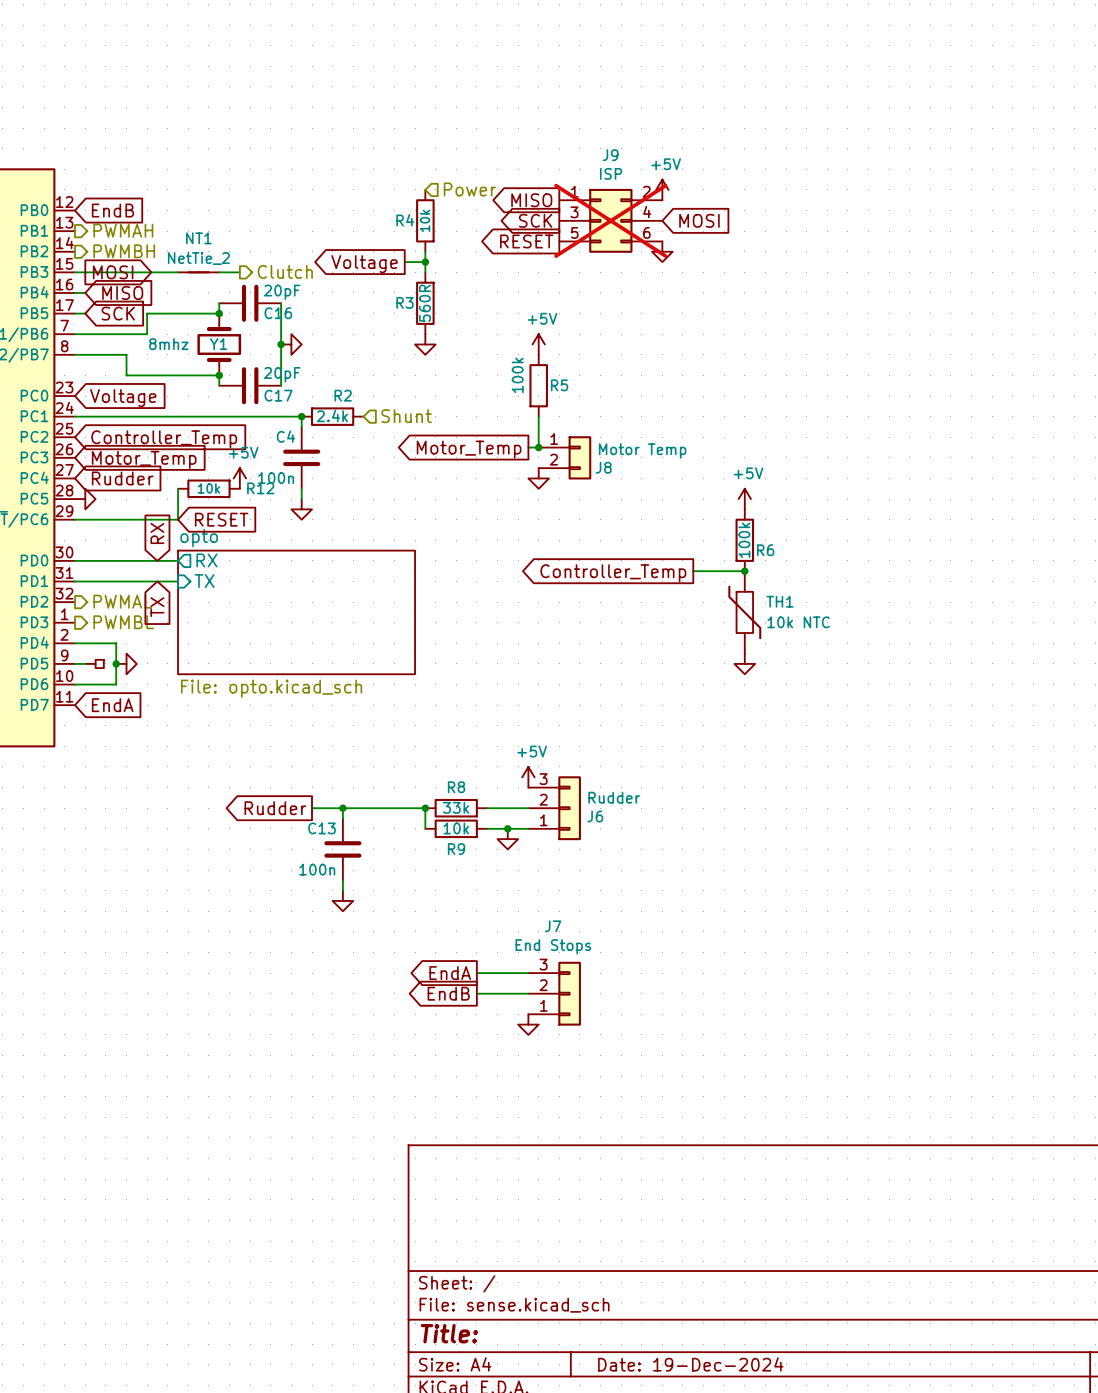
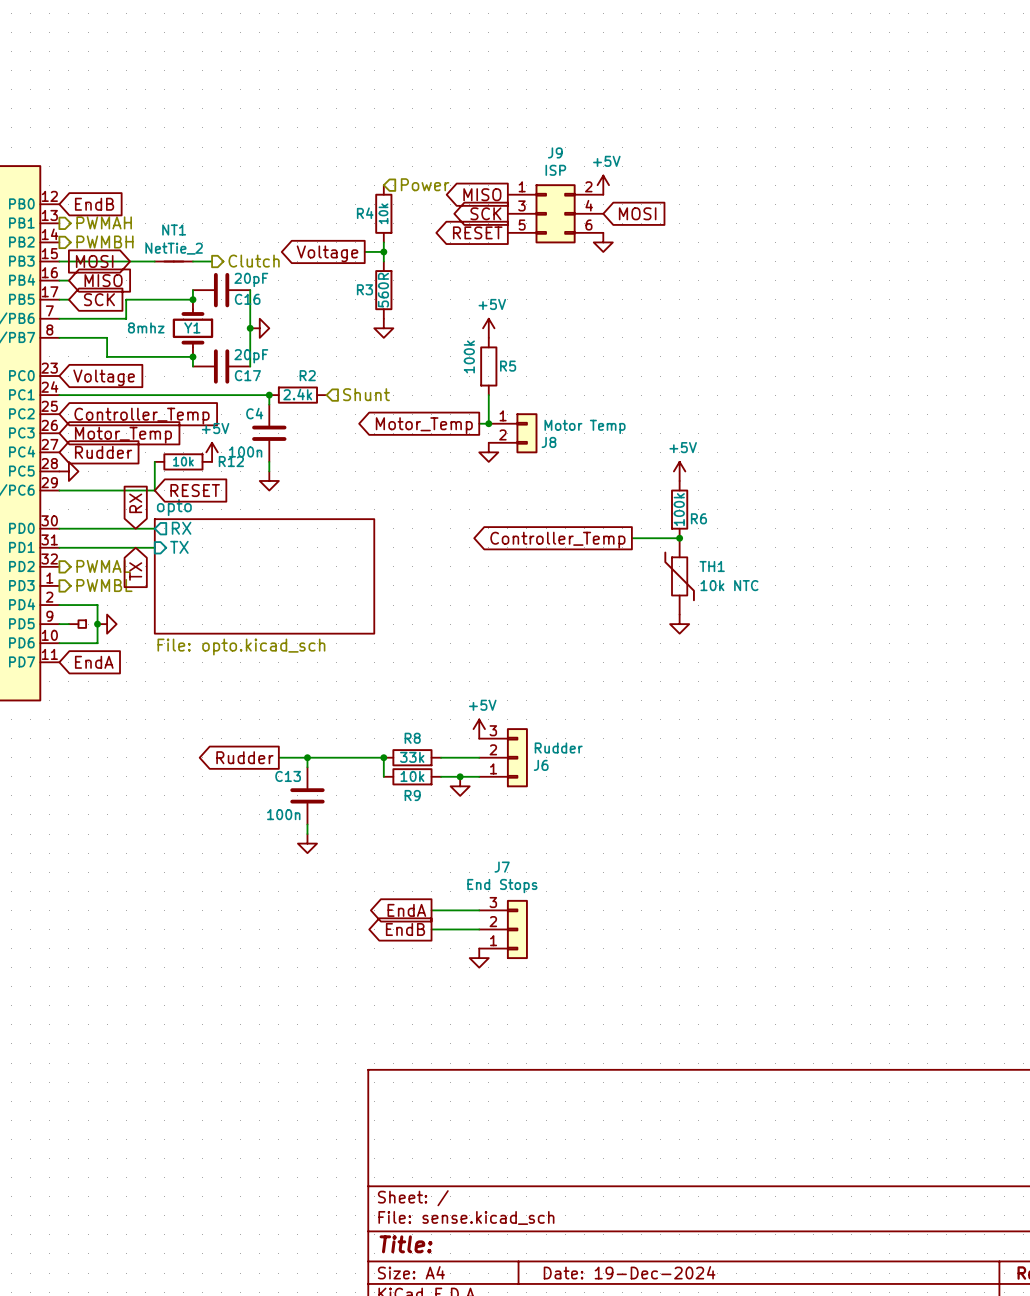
J9 do-not-place cross: (610, 220) -> none

